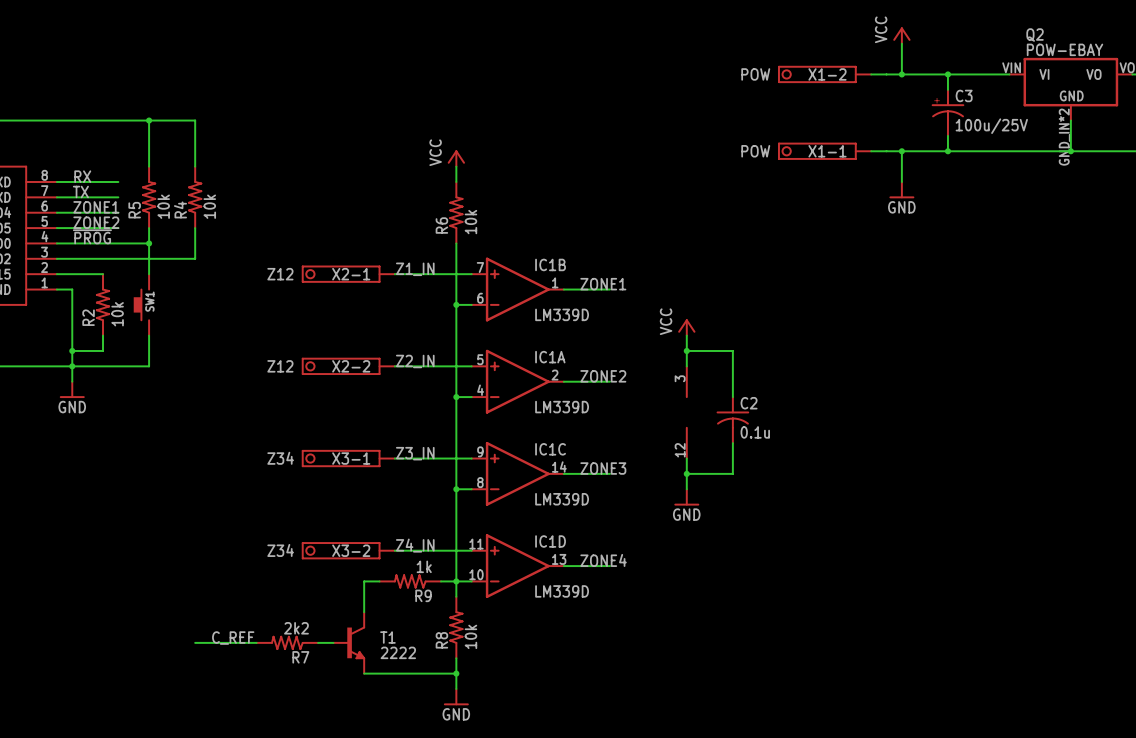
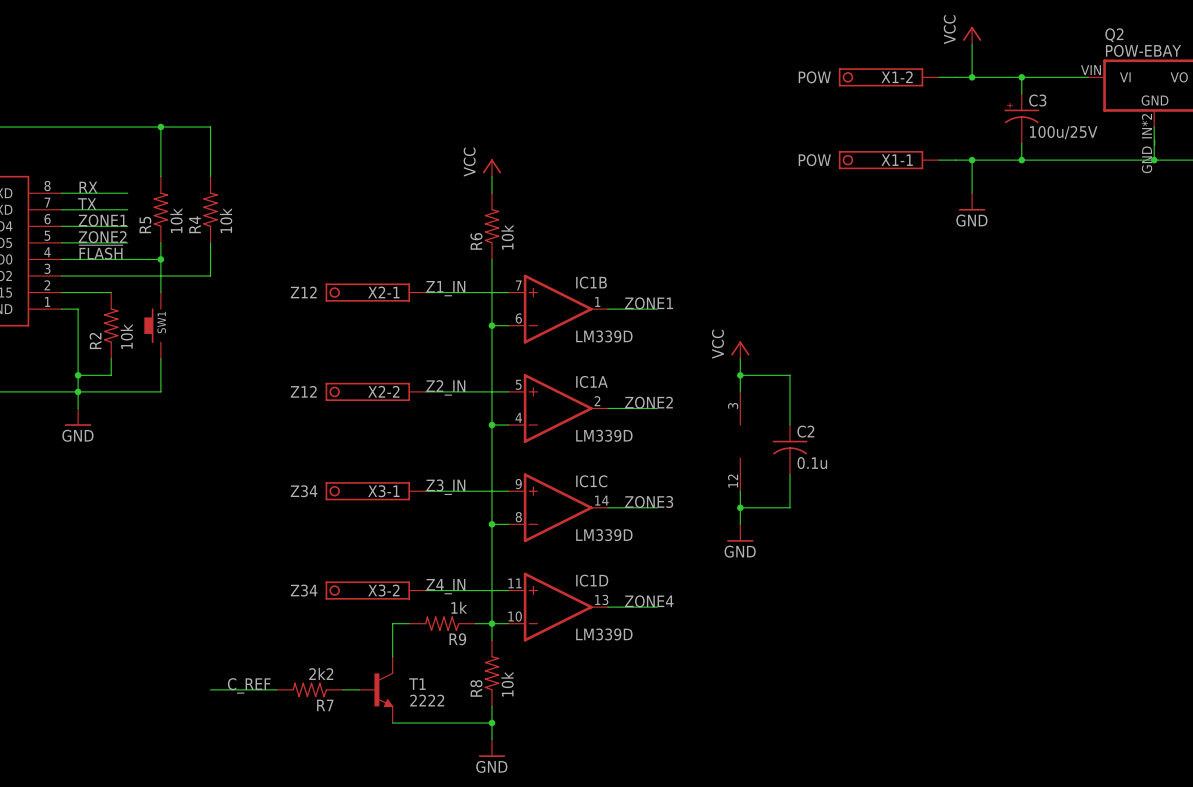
label: ~{PROG} (92, 236) -> ~{FLASH} (101, 252)

